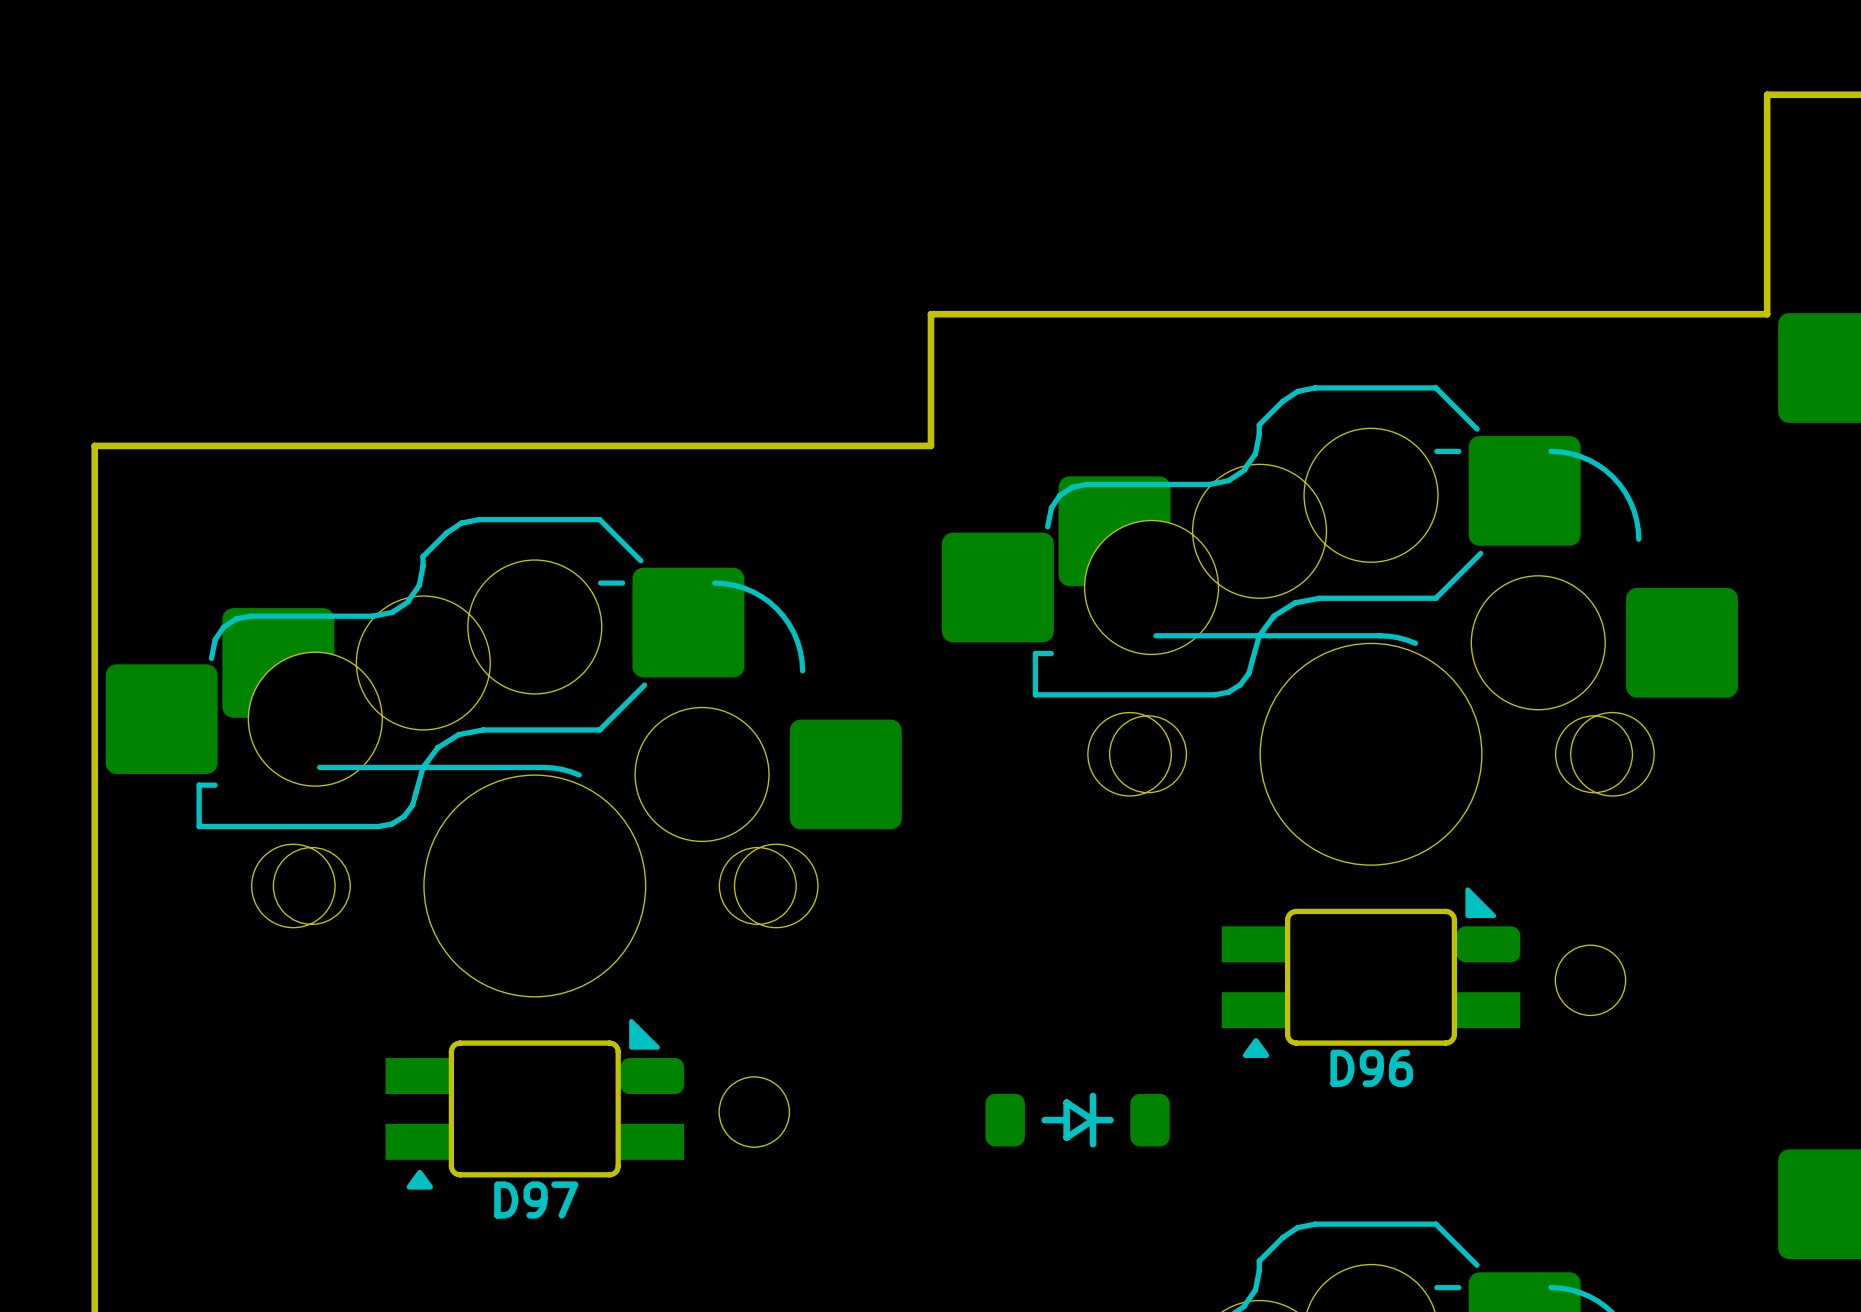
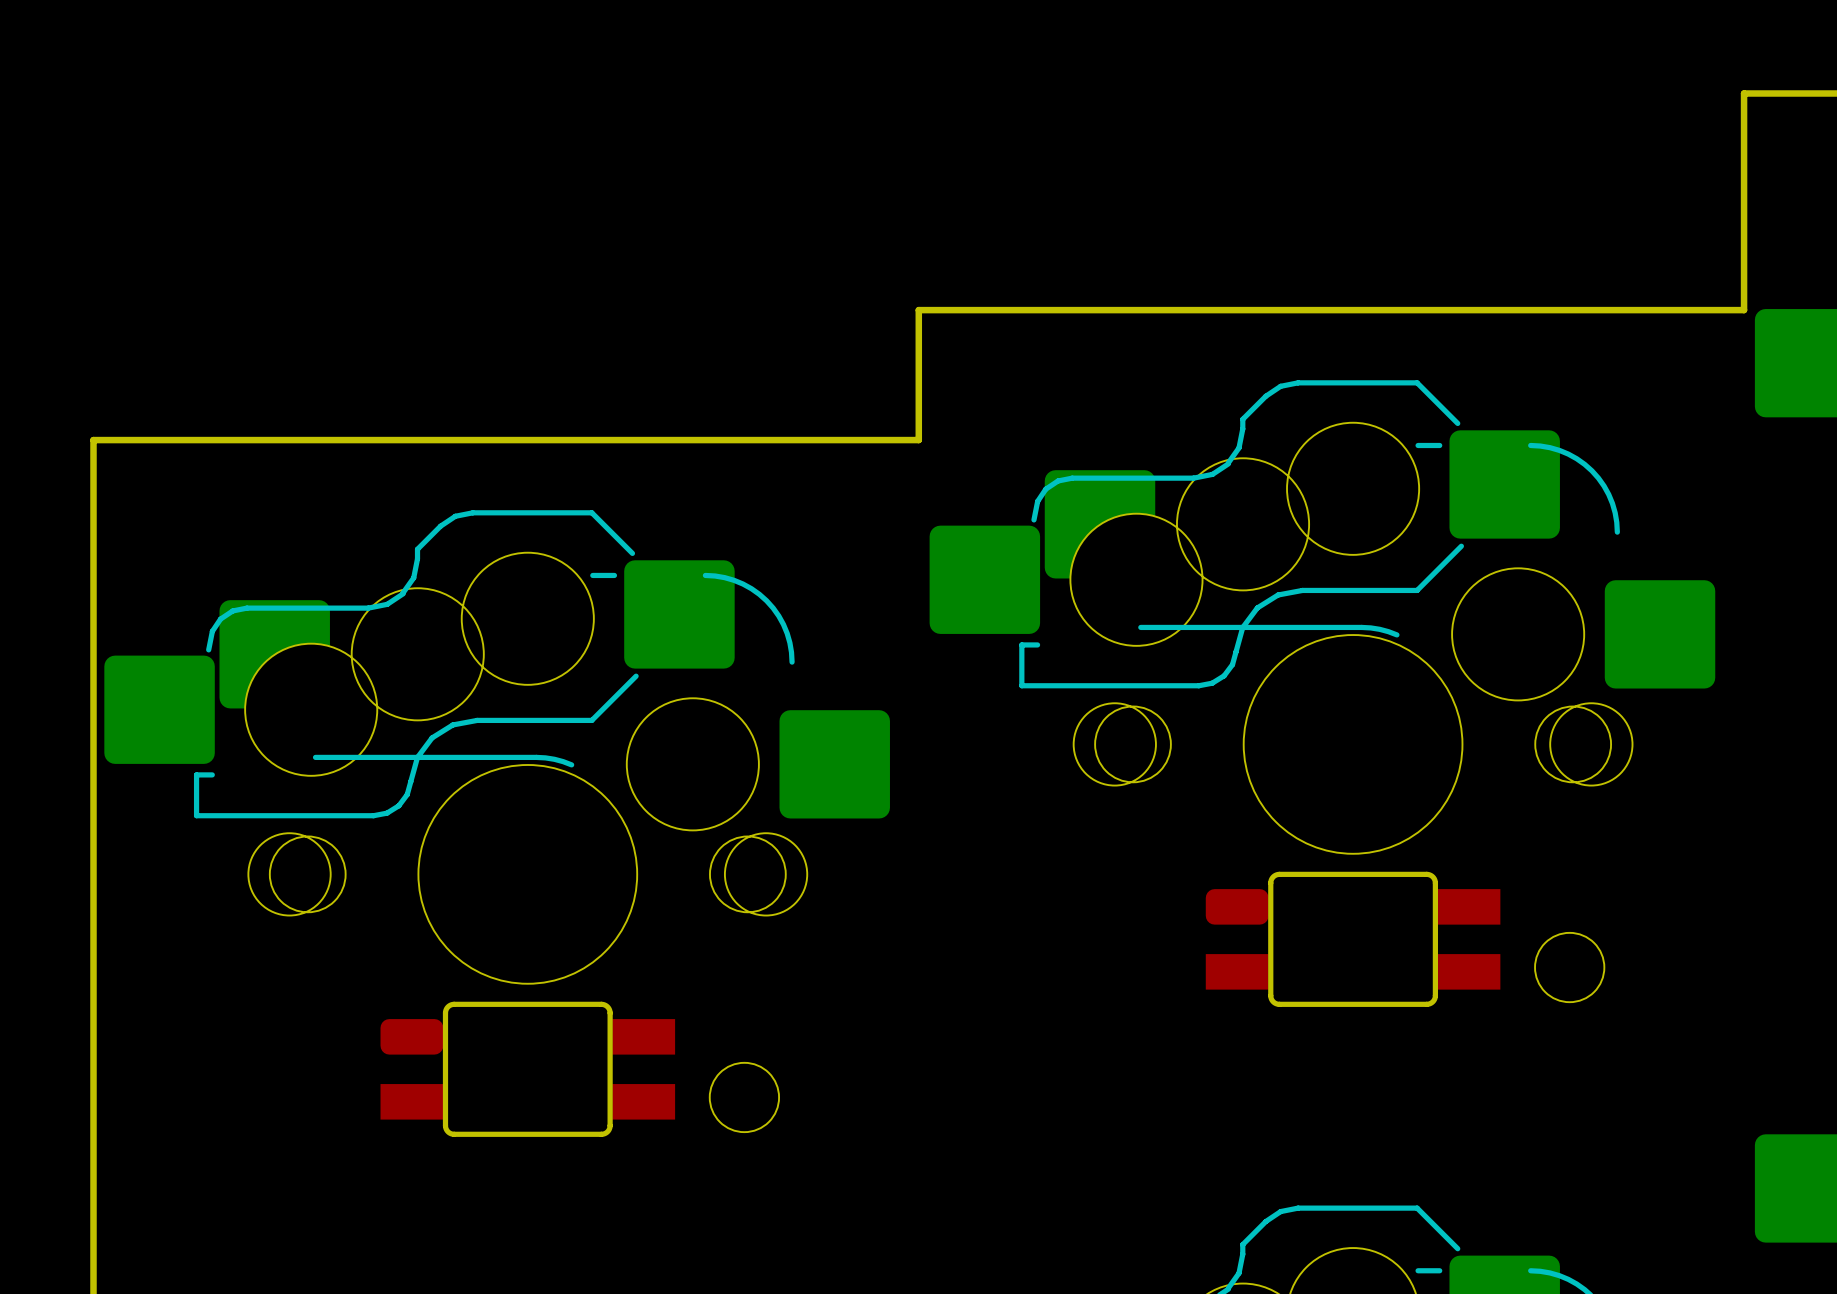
part: none -> (1353, 939)
D96: (1371, 972) -> none
part: none -> (527, 1069)
D97: (534, 1104) -> none
part: (1077, 1120) -> none

